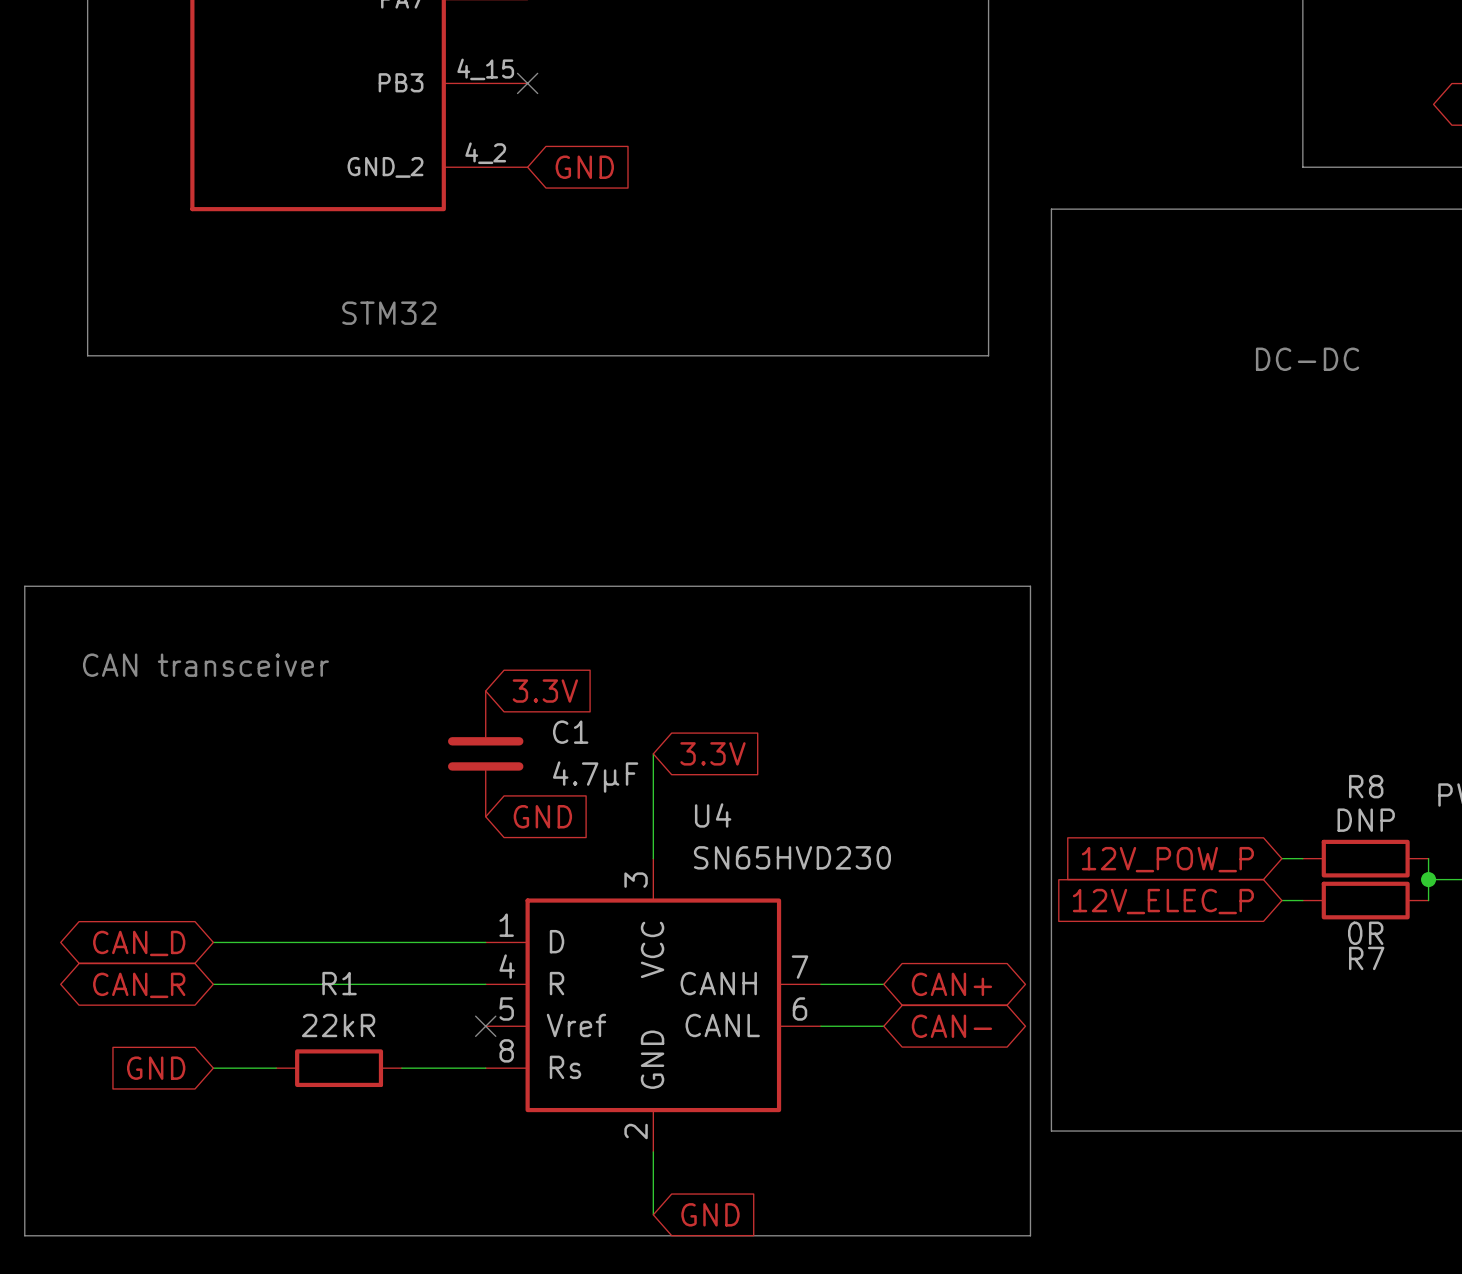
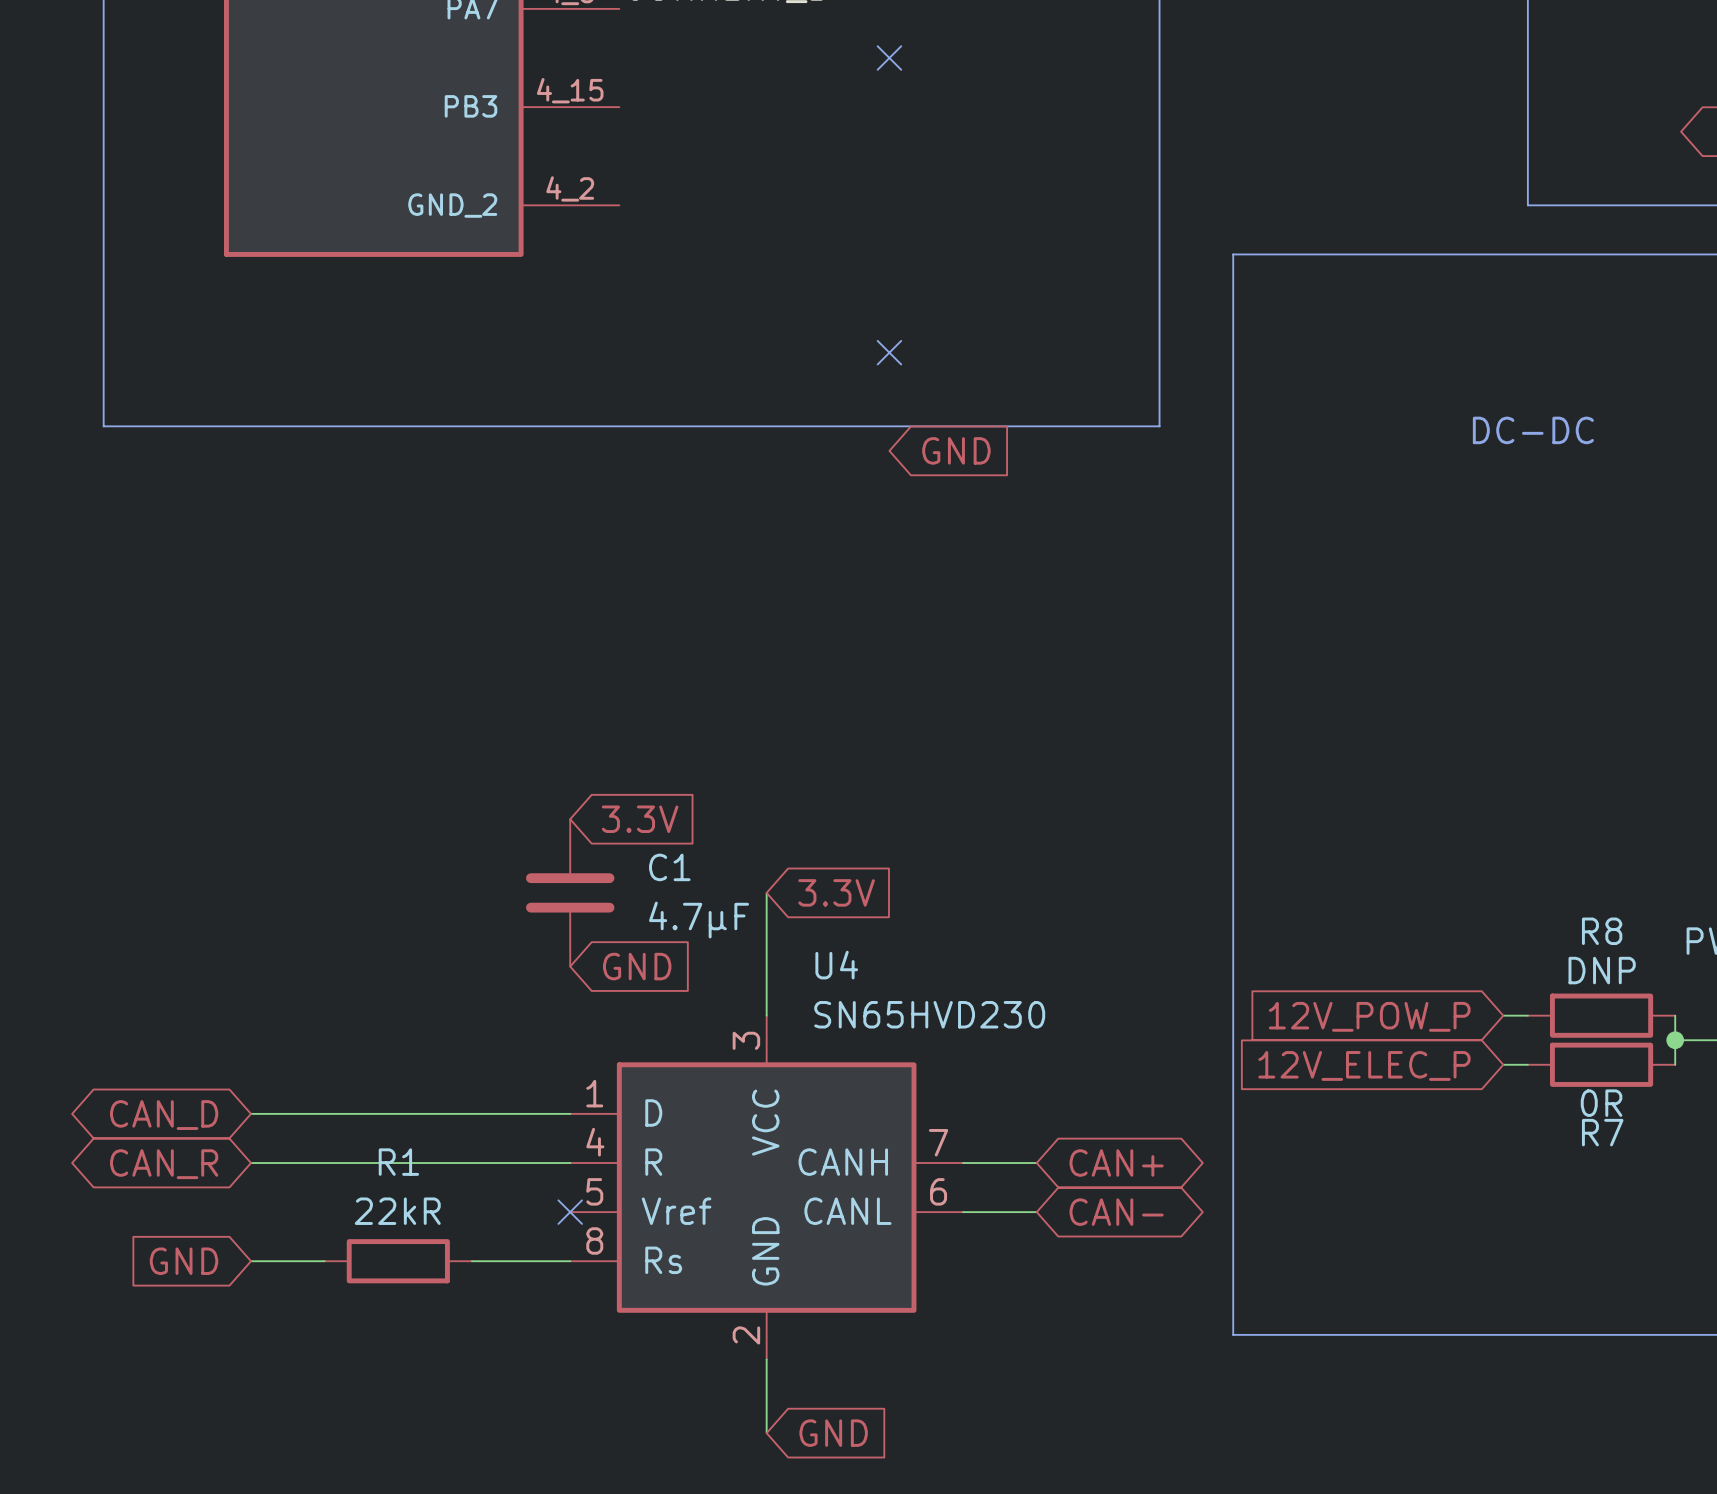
no-connect mark: none -> (889, 58)
no-connect mark: (527, 83) -> none
global label position: GND (584, 167) -> GND (956, 450)
no-connect mark: none -> (889, 352)
text: STM32 (389, 313) -> none
line: (24, 586) (1030, 586) (1030, 1235) (24, 1235) (24, 586) -> none
text: CAN transceiver (205, 665) -> none

